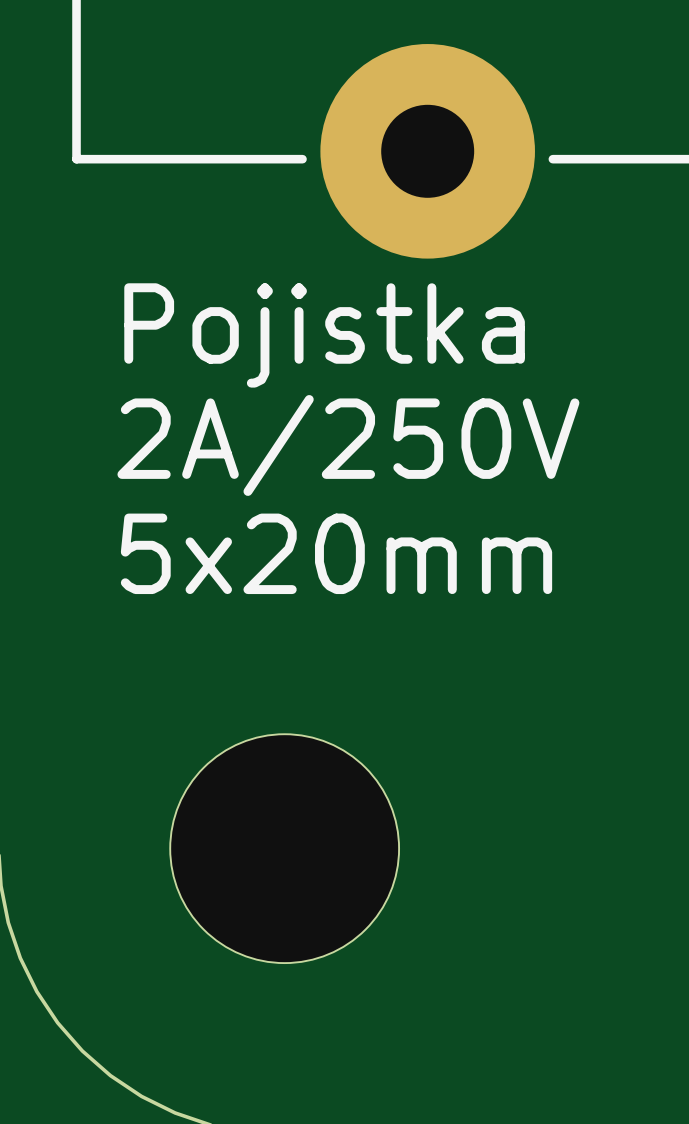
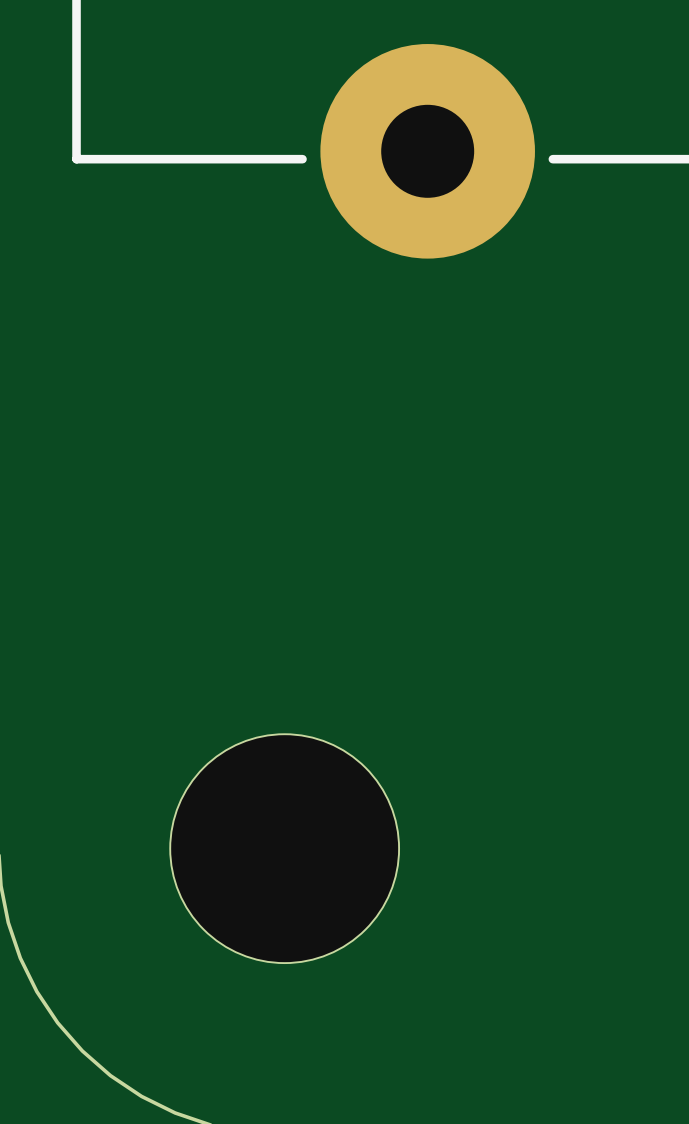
text: Pojistka (324, 335) -> none
text: 2A/250V (348, 445) -> none
text: 5x20mm (336, 553) -> none

